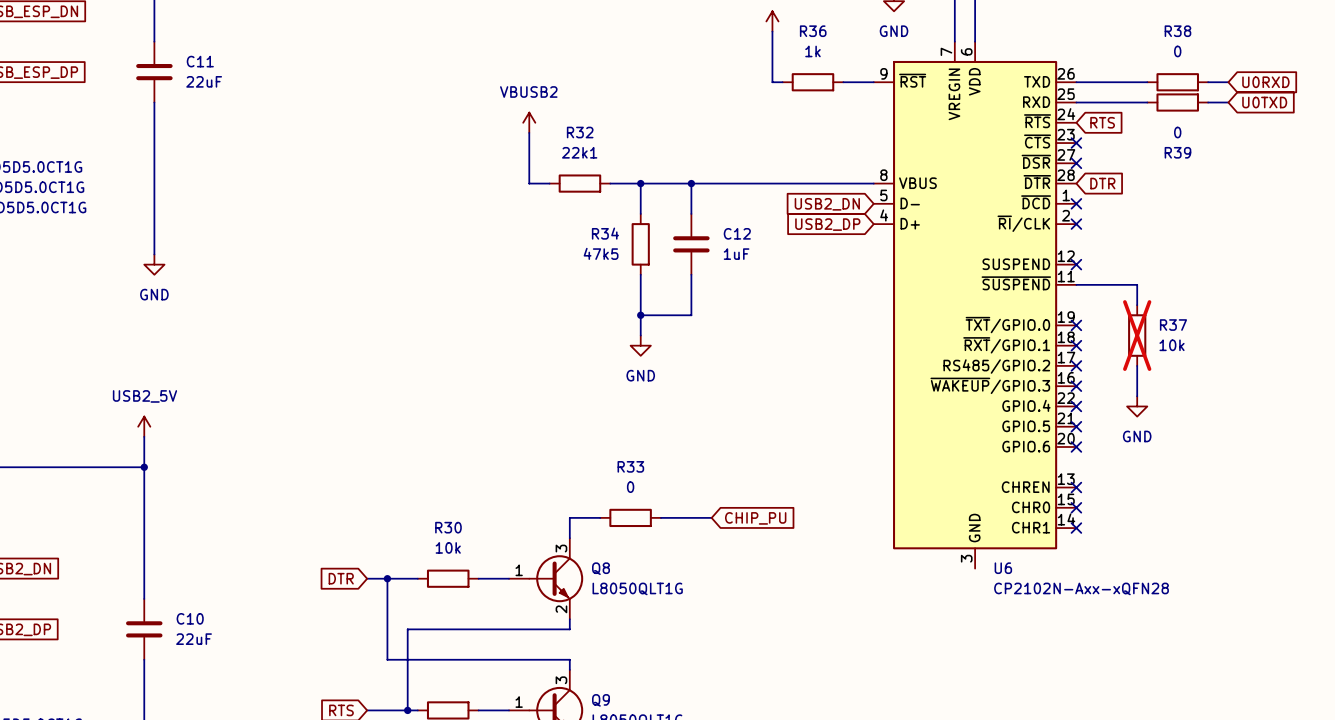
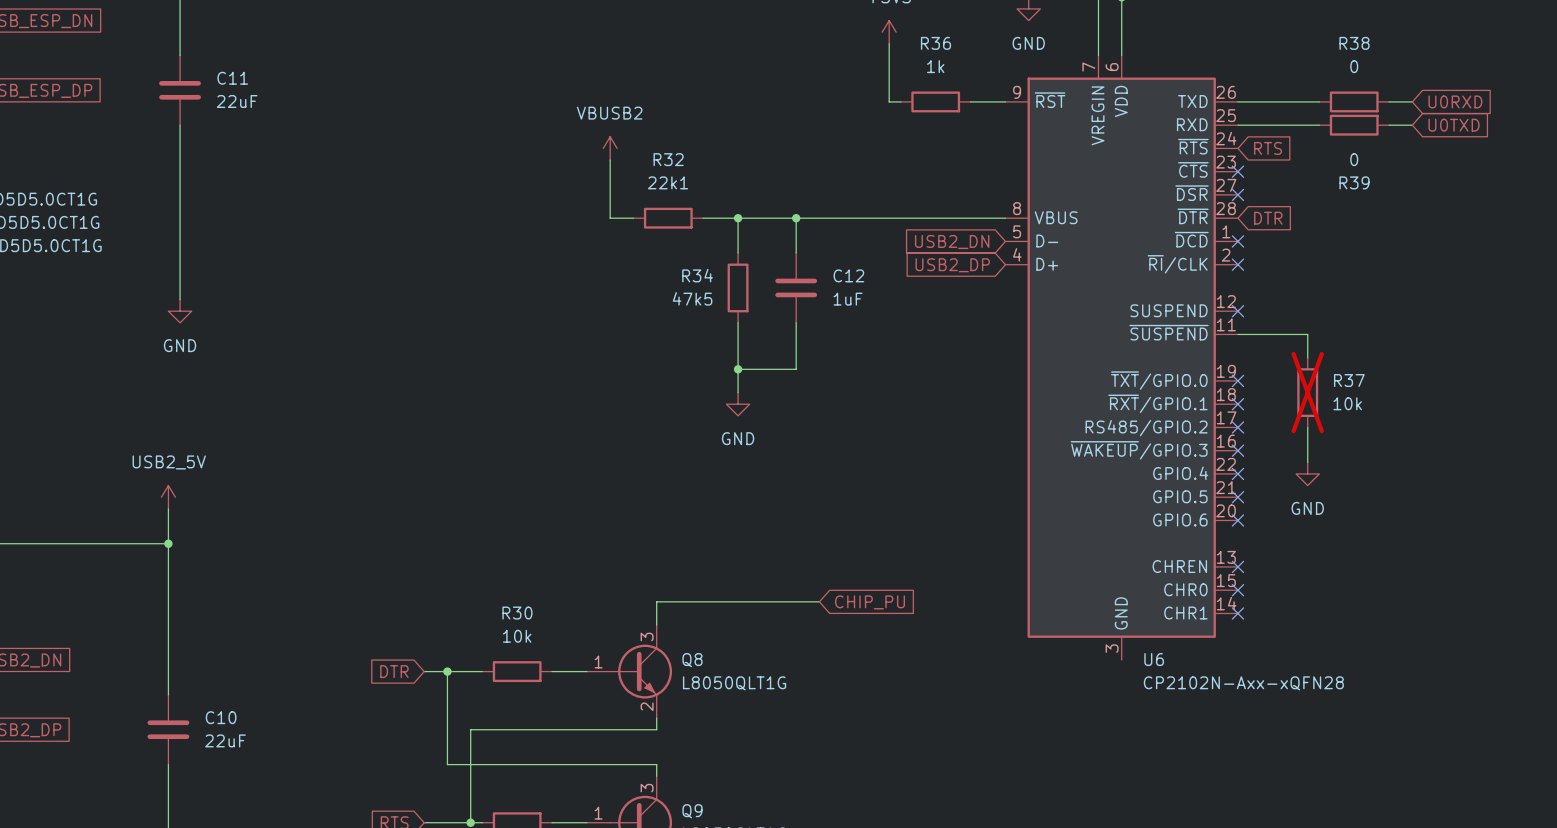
wire: none -> (691, 601) (761, 601)
R33: 0 (630, 517) -> none

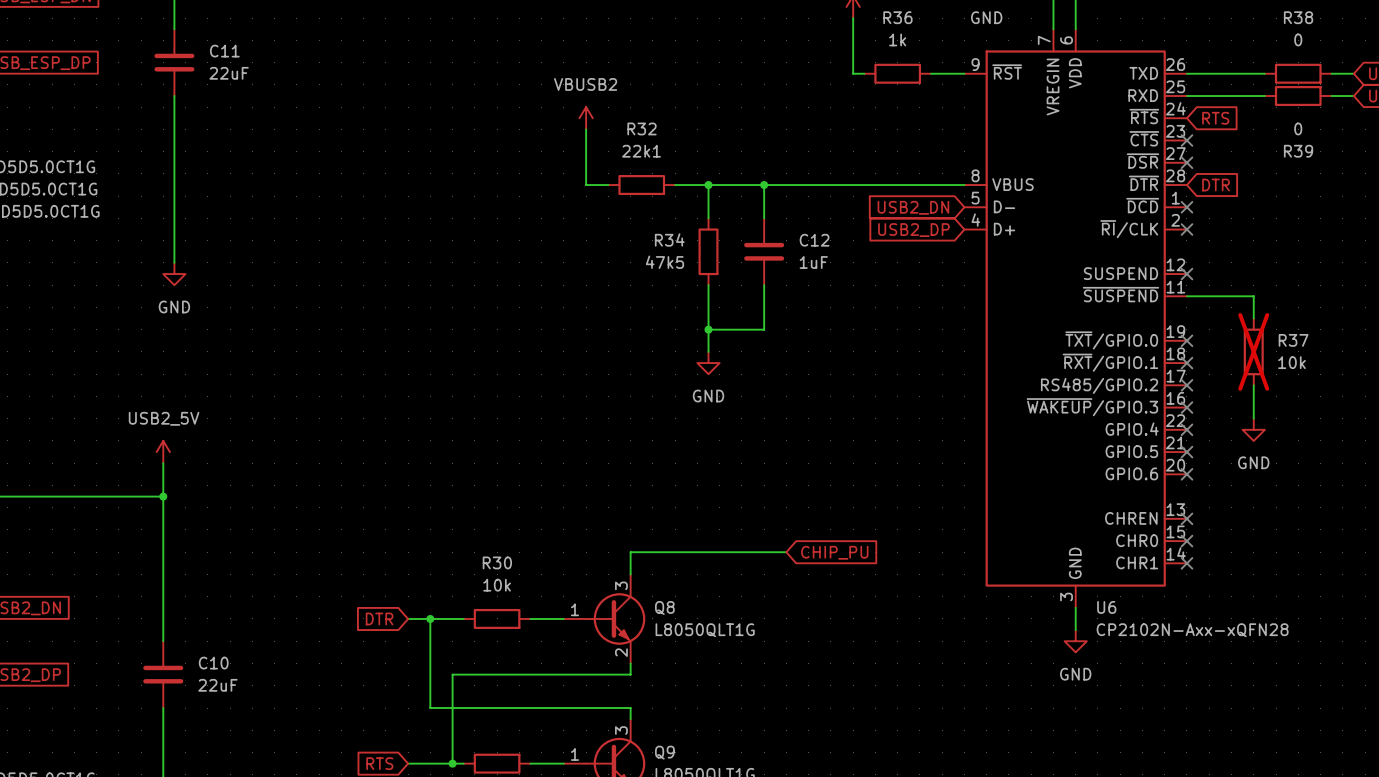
wire: none -> (1075, 607) (1075, 630)
power symbol: none -> GND (1075, 641)

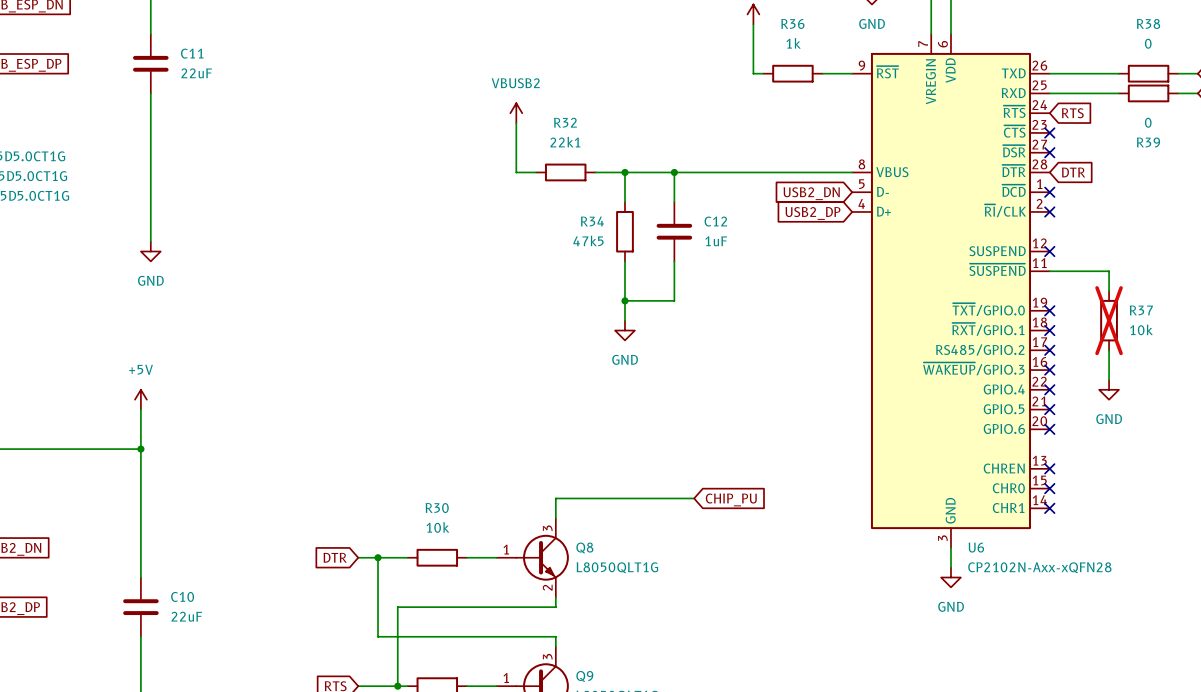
power symbol: none -> +5V (140, 399)
power symbol: USB2_5V (163, 452) -> none

